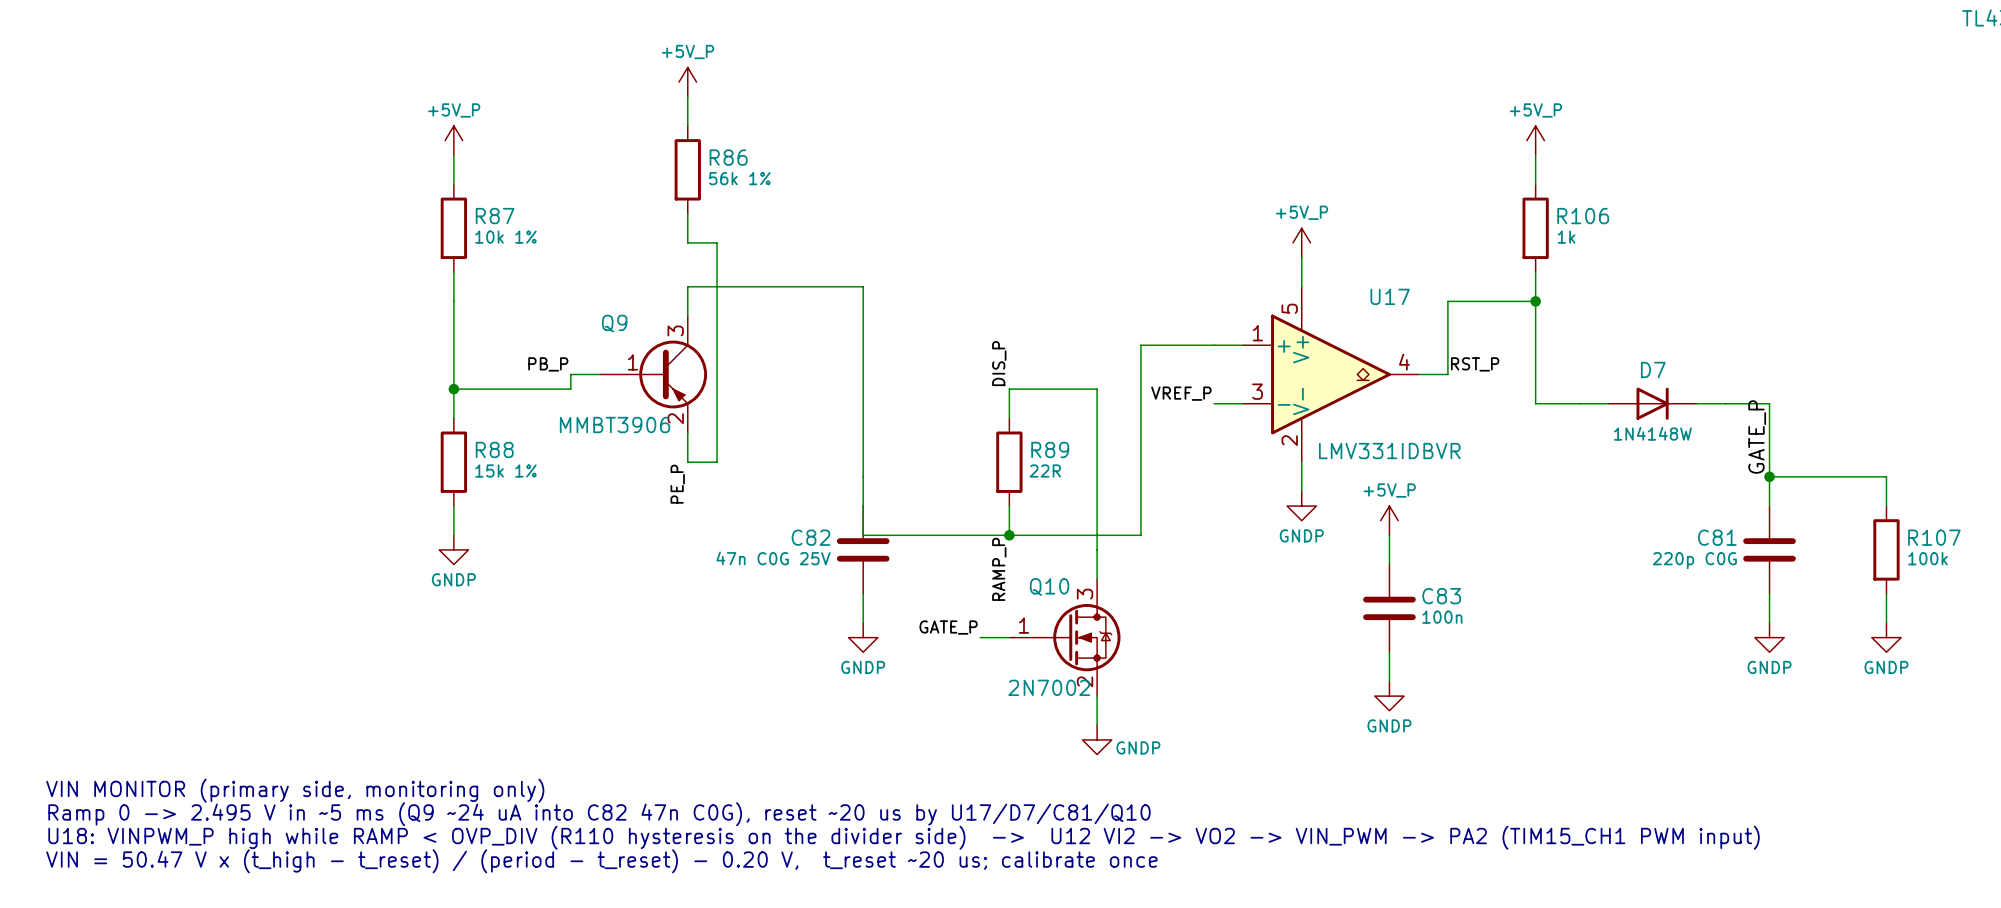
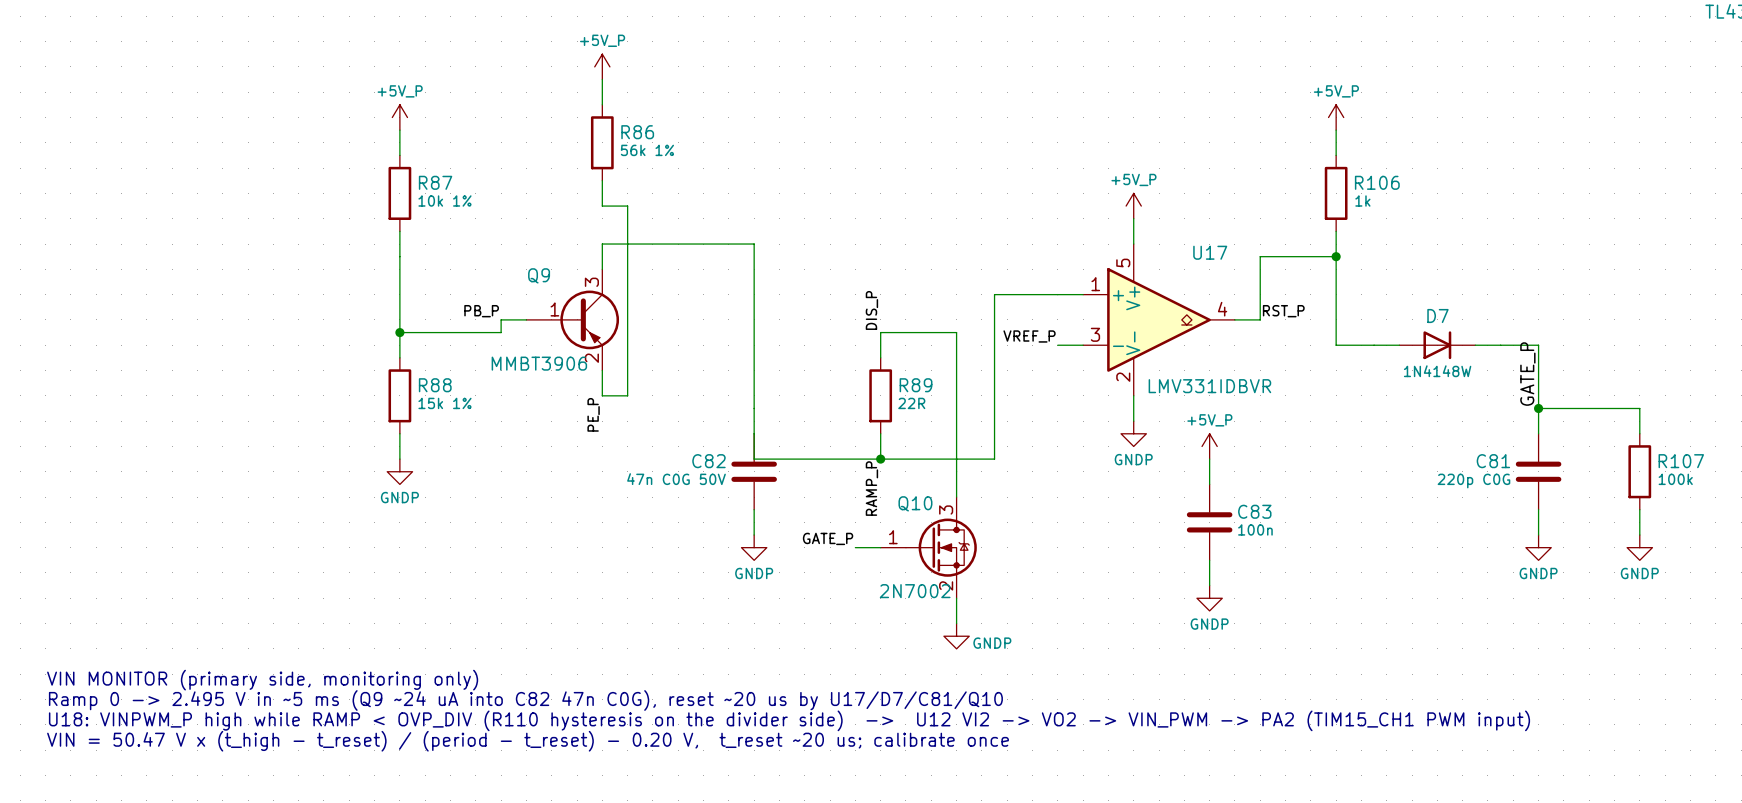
C82 value: 47n C0G 25V (773, 558) -> 47n C0G 50V (676, 479)

